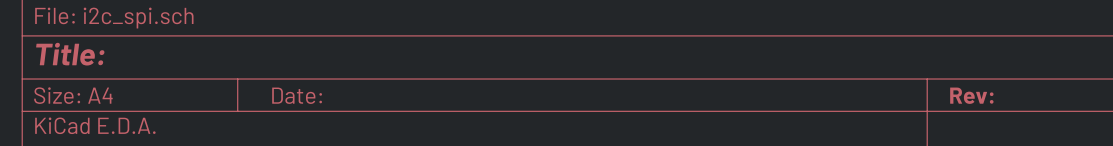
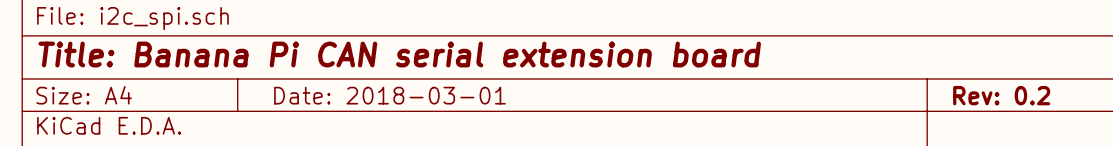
title block: Title: (70, 54) -> Title: Banana Pi CAN serial extension board (399, 54)
title block: Date: (297, 95) -> Date: 2018-03-01 (390, 95)
title block: Rev: (971, 95) -> Rev: 0.2 (1001, 95)

